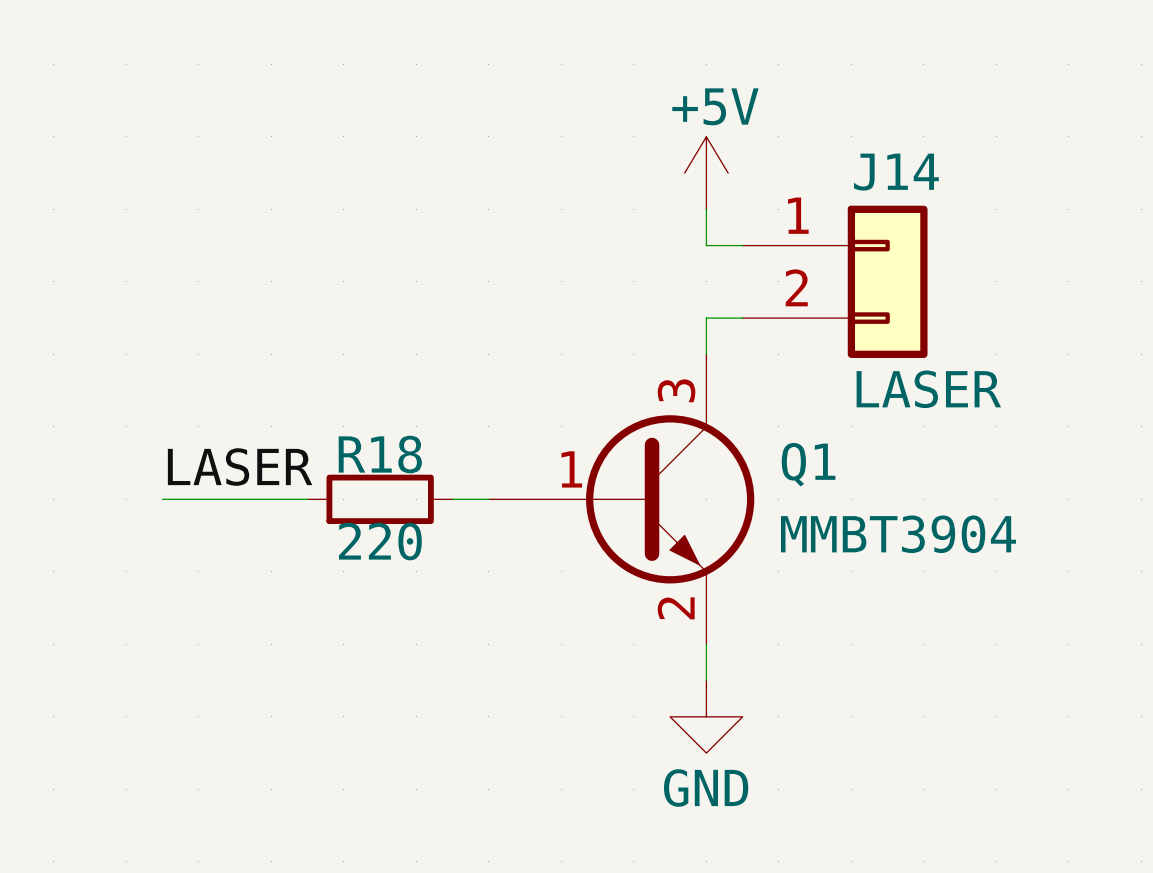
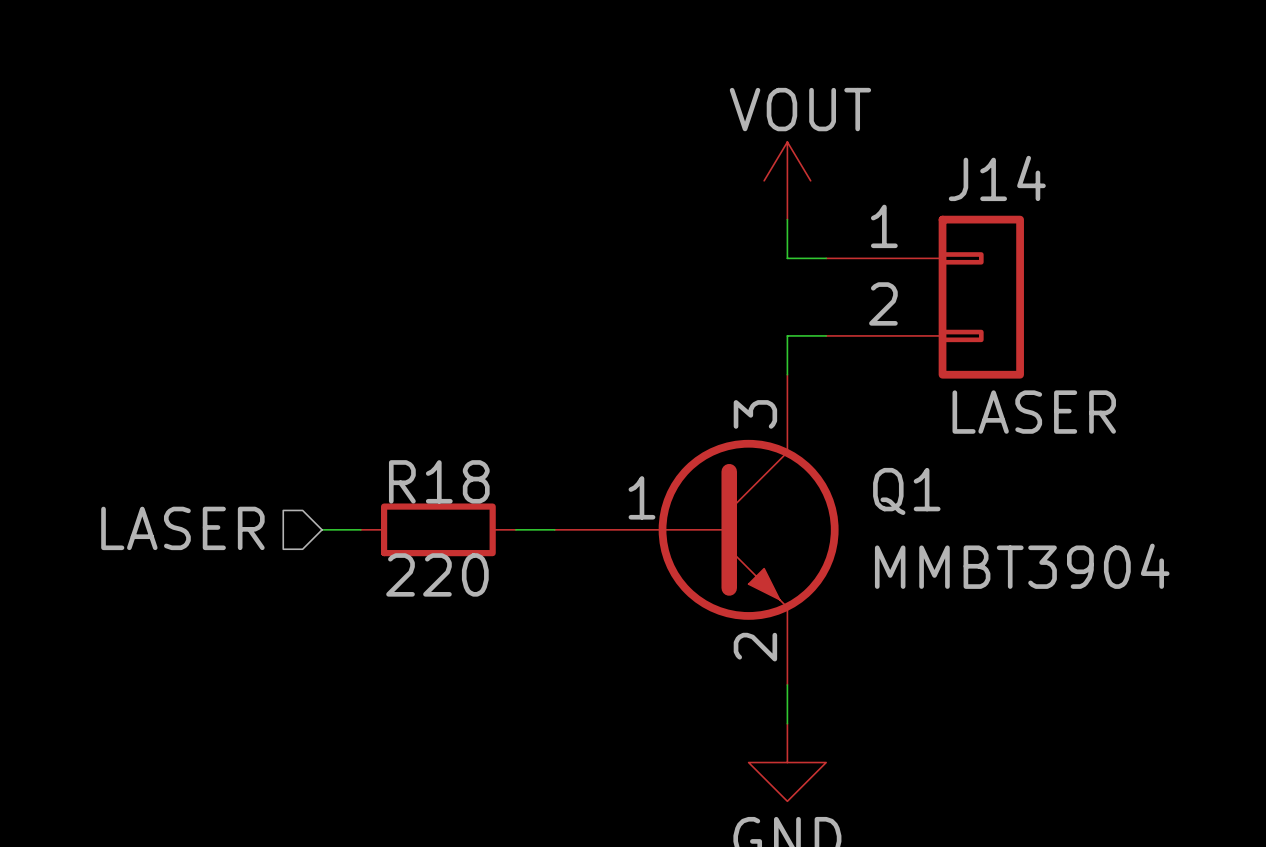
power symbol: +5V (706, 173) -> VOUT (787, 180)
label: LASER (240, 467) -> none
hierarchical label: none -> LASER (182, 528)
wire: (162, 499) (271, 499) -> none

